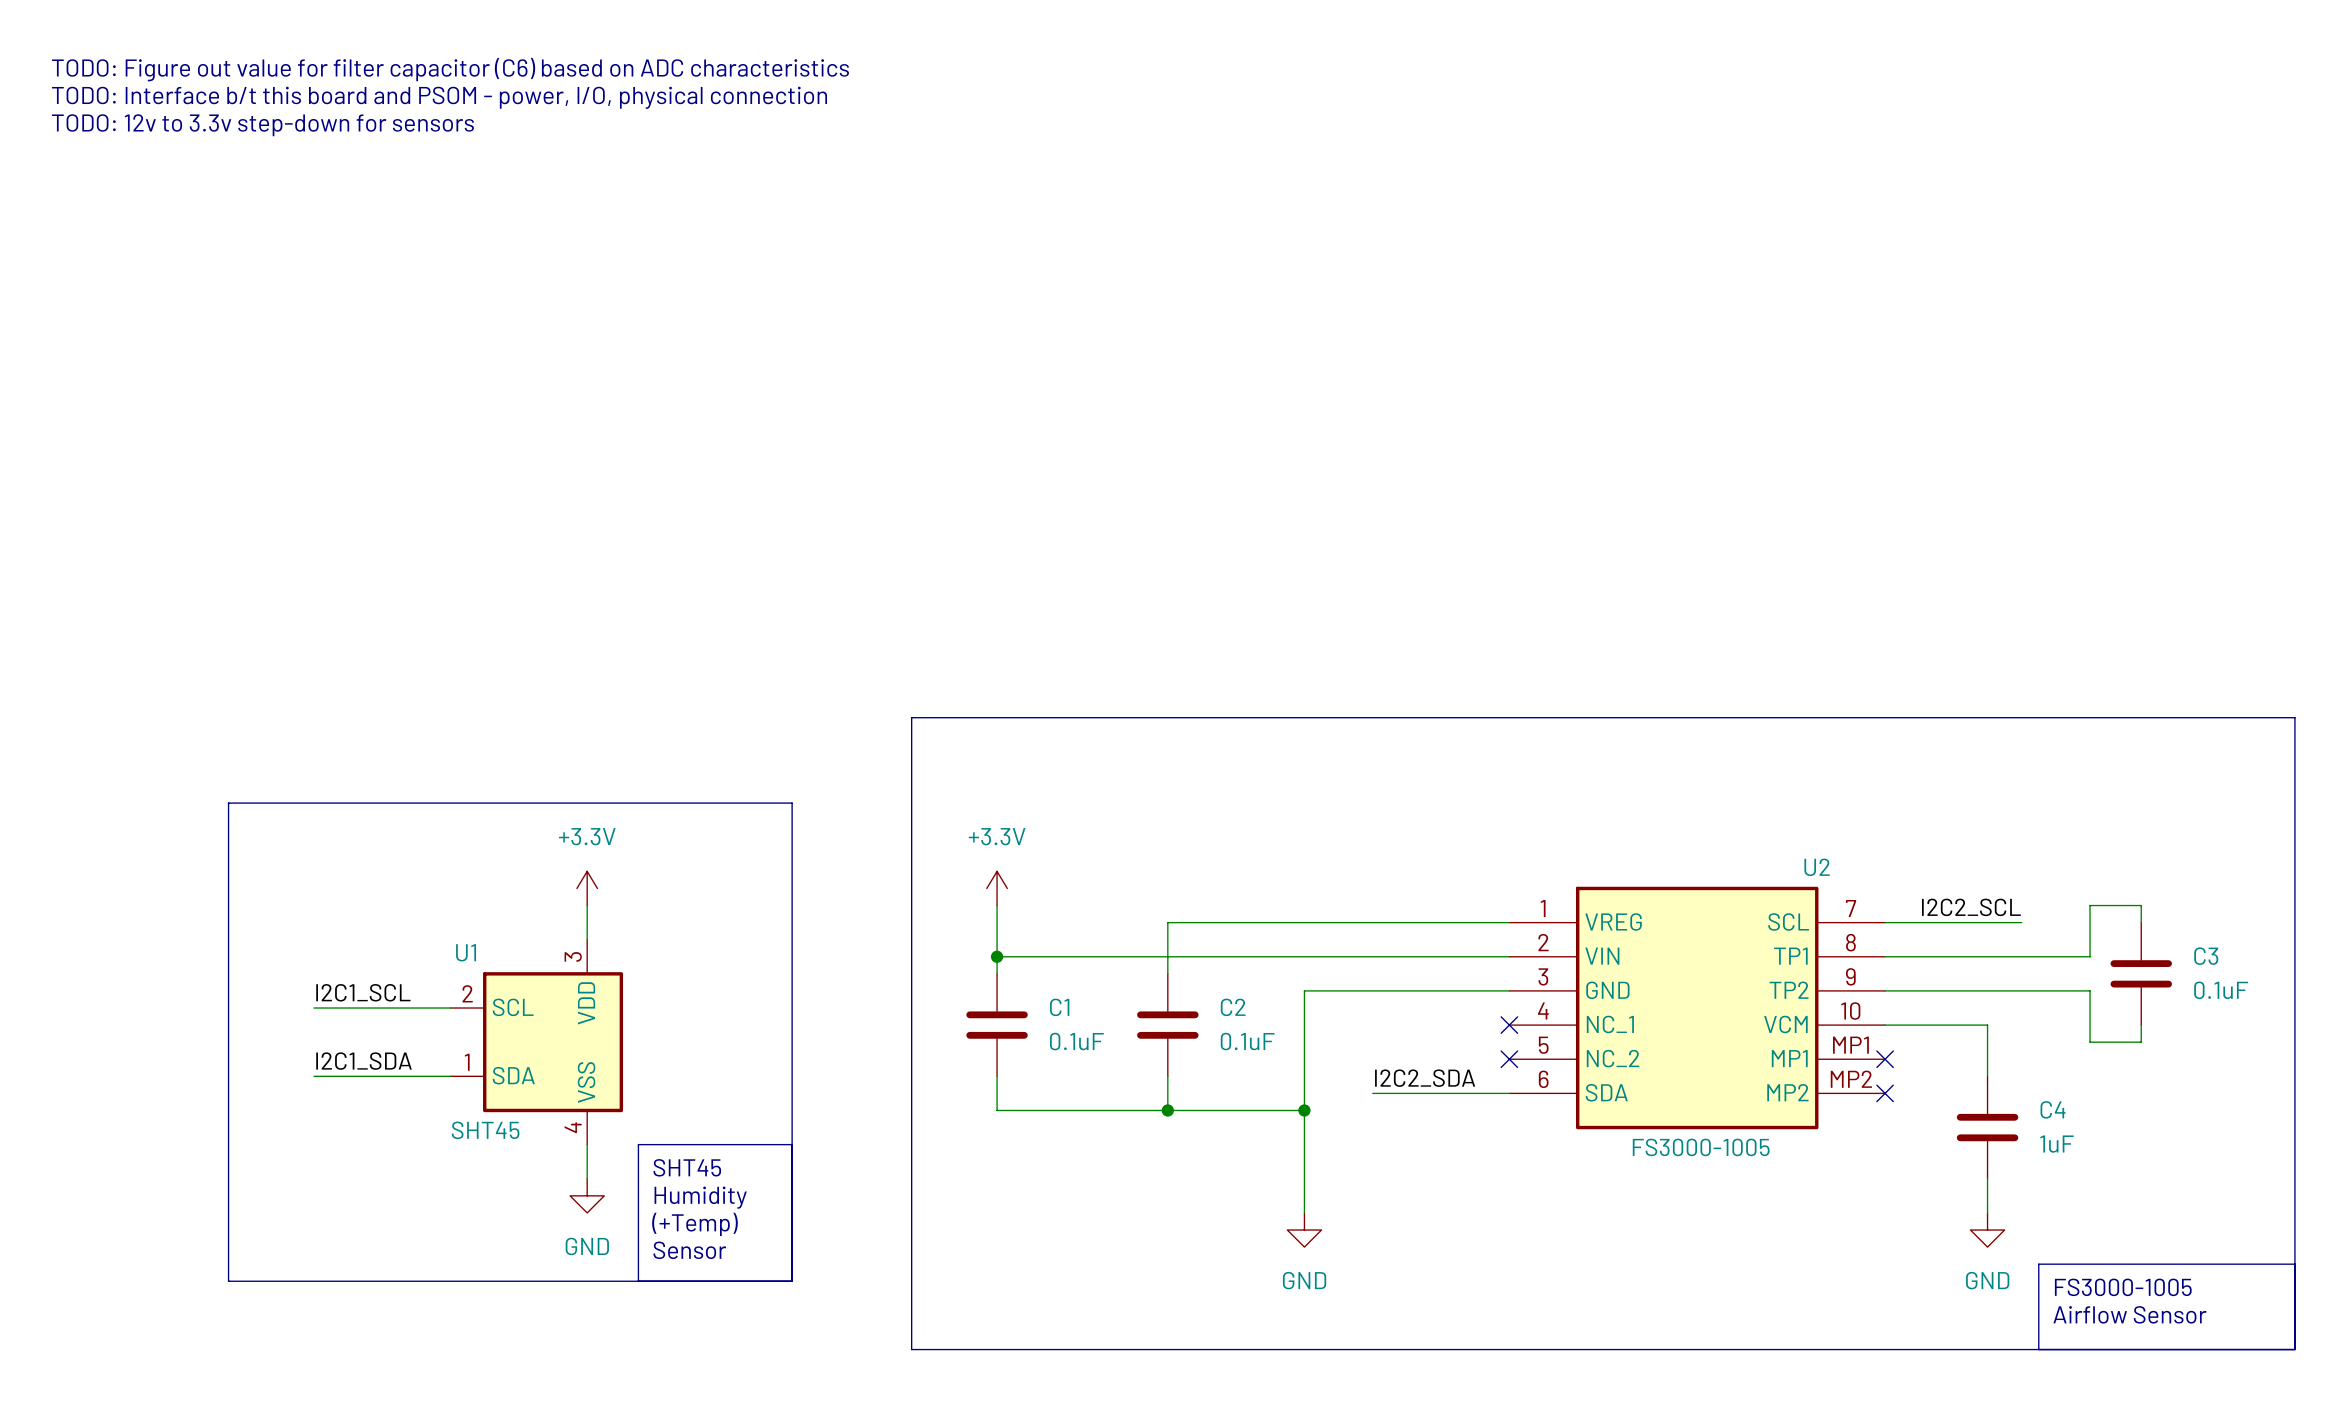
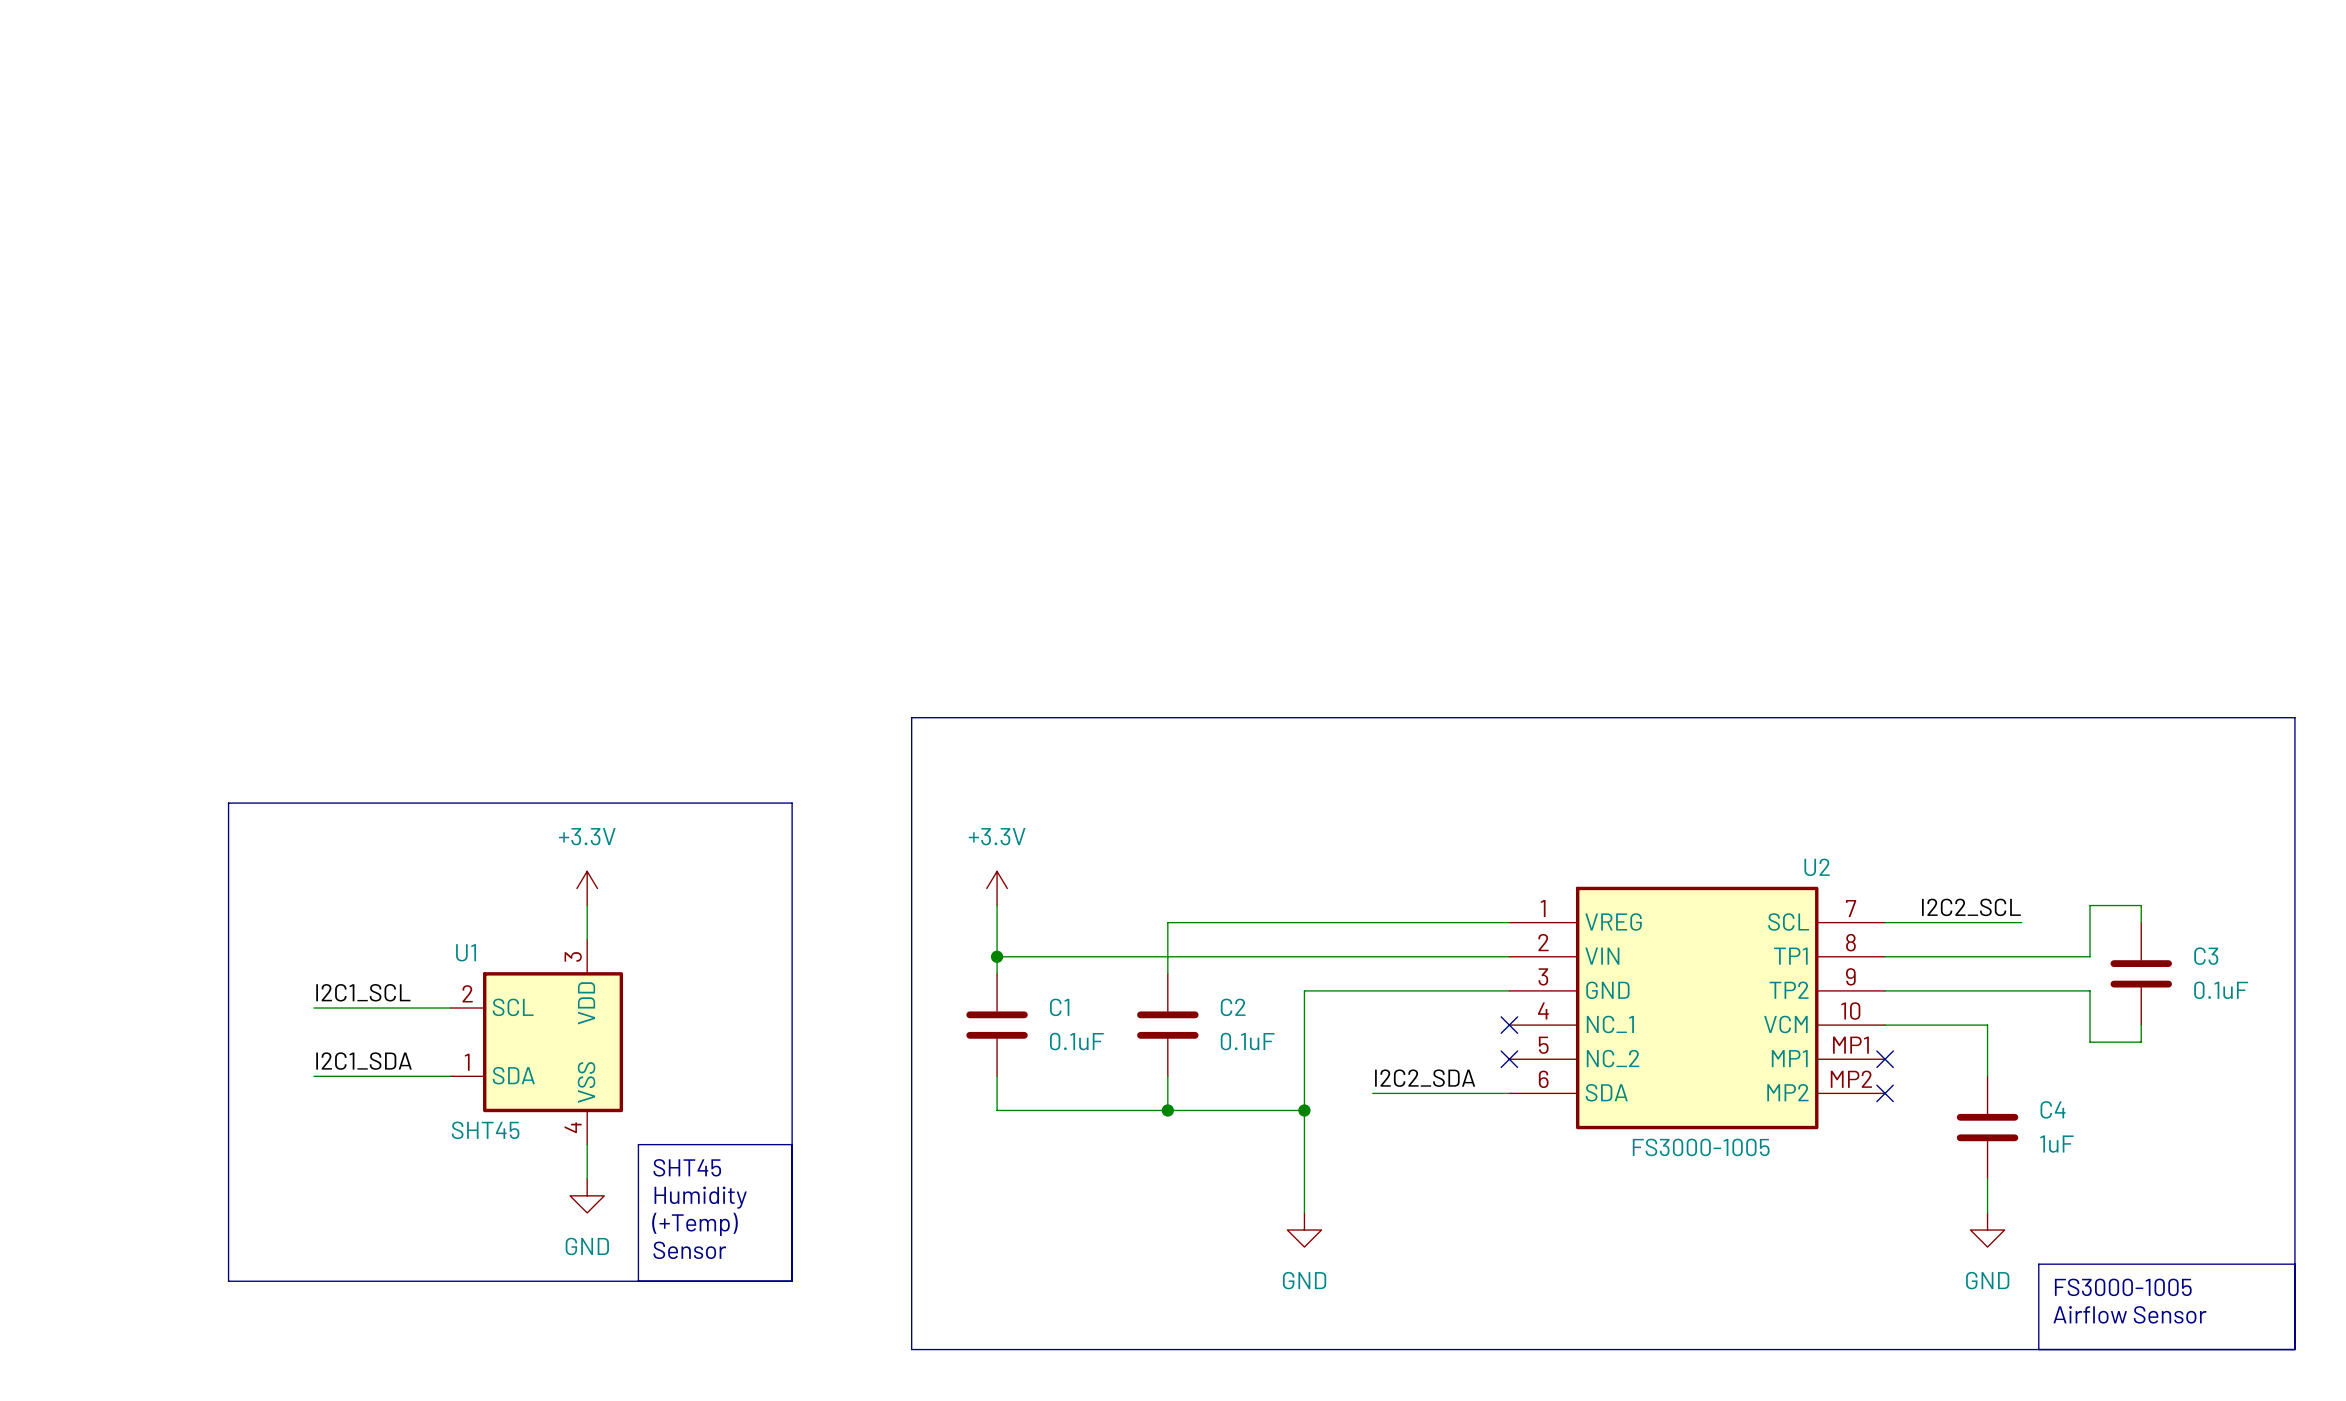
text: TODO: Figure out value for filter capacitor (C6) based on ADC characteristics (450, 69) -> none
text: TODO: Interface b/t this board and PSOM - power, I/O, physical connection (439, 97) -> none
text: TODO: 12v to 3.3v step-down for sensors (262, 125) -> none

